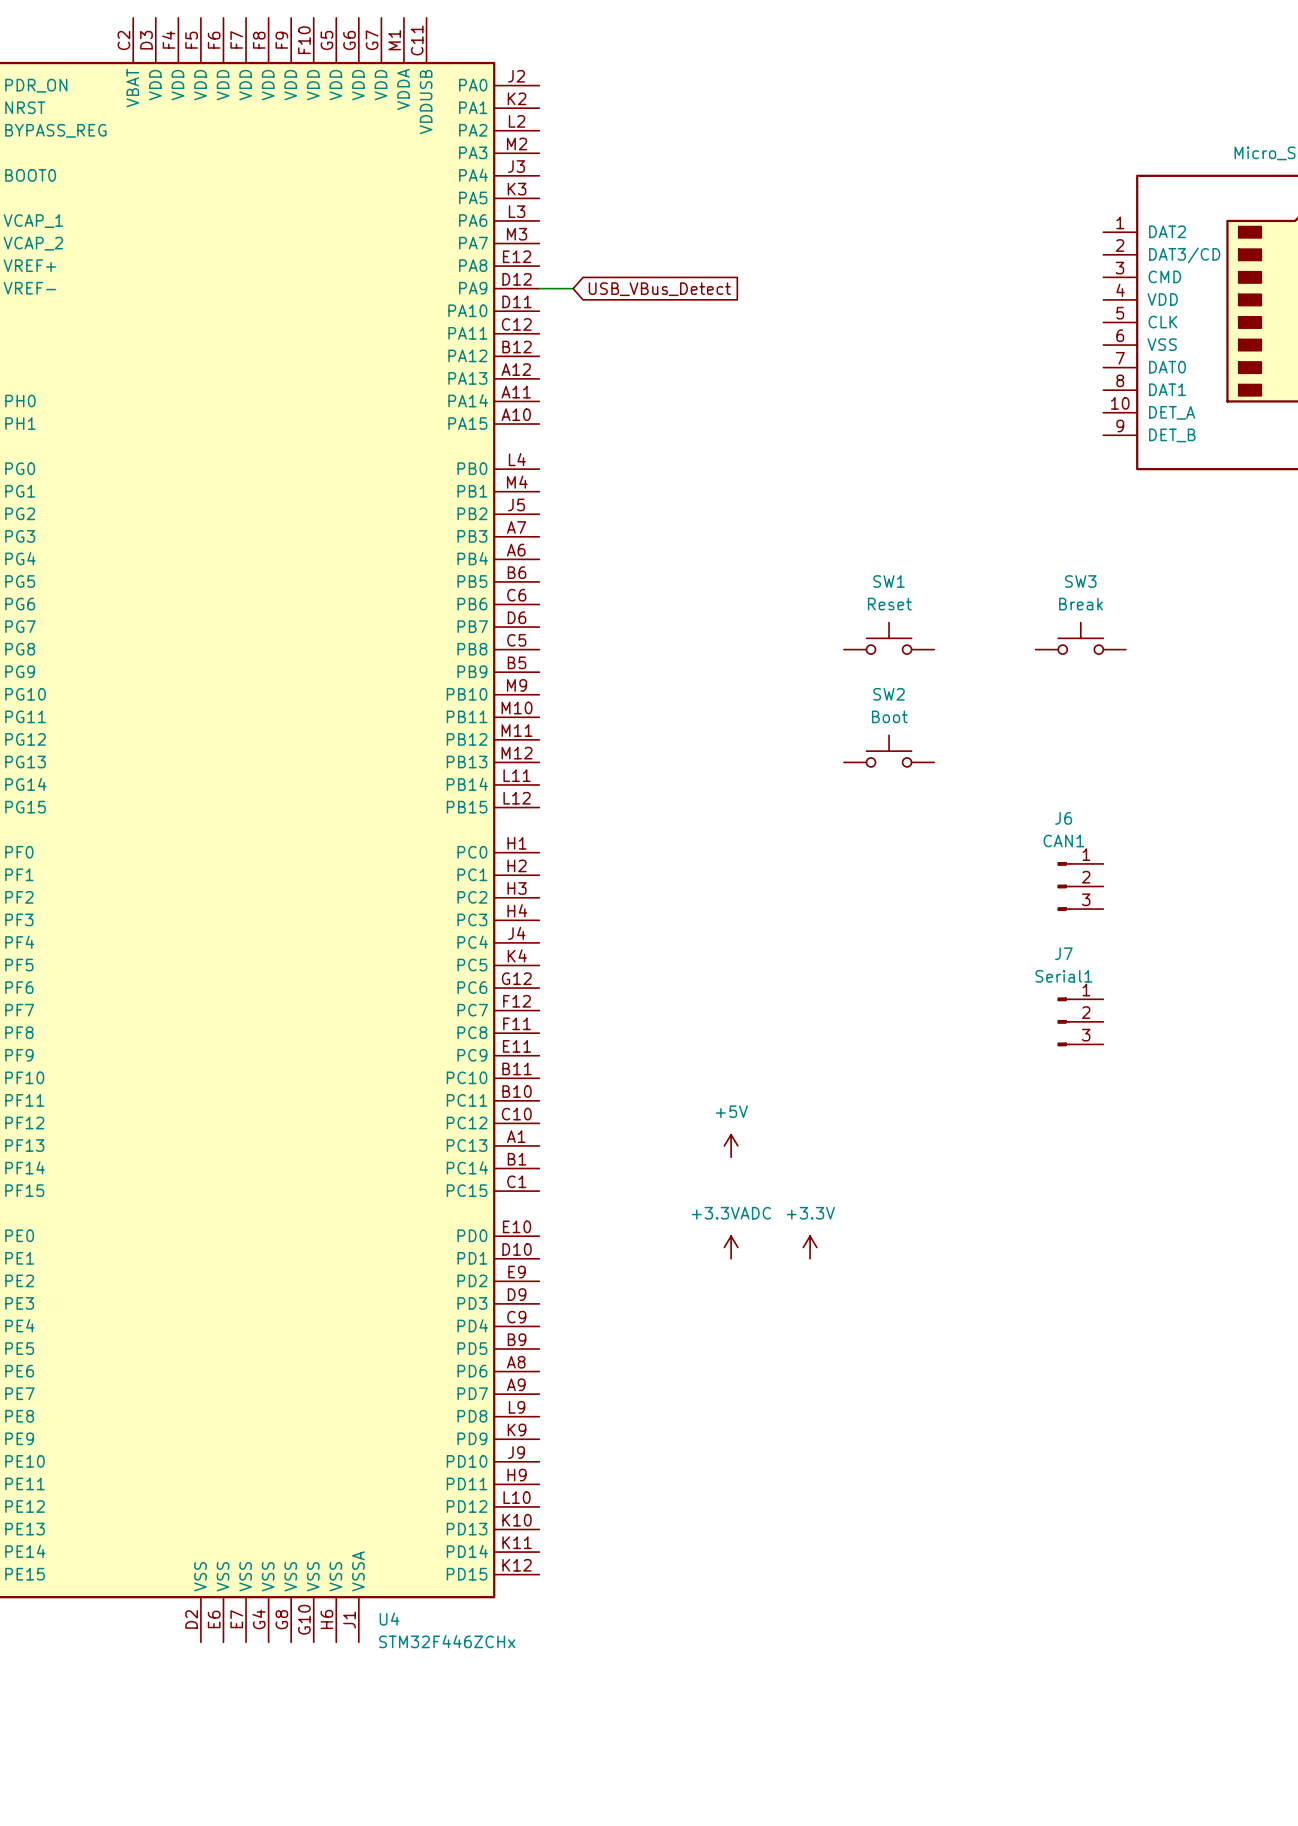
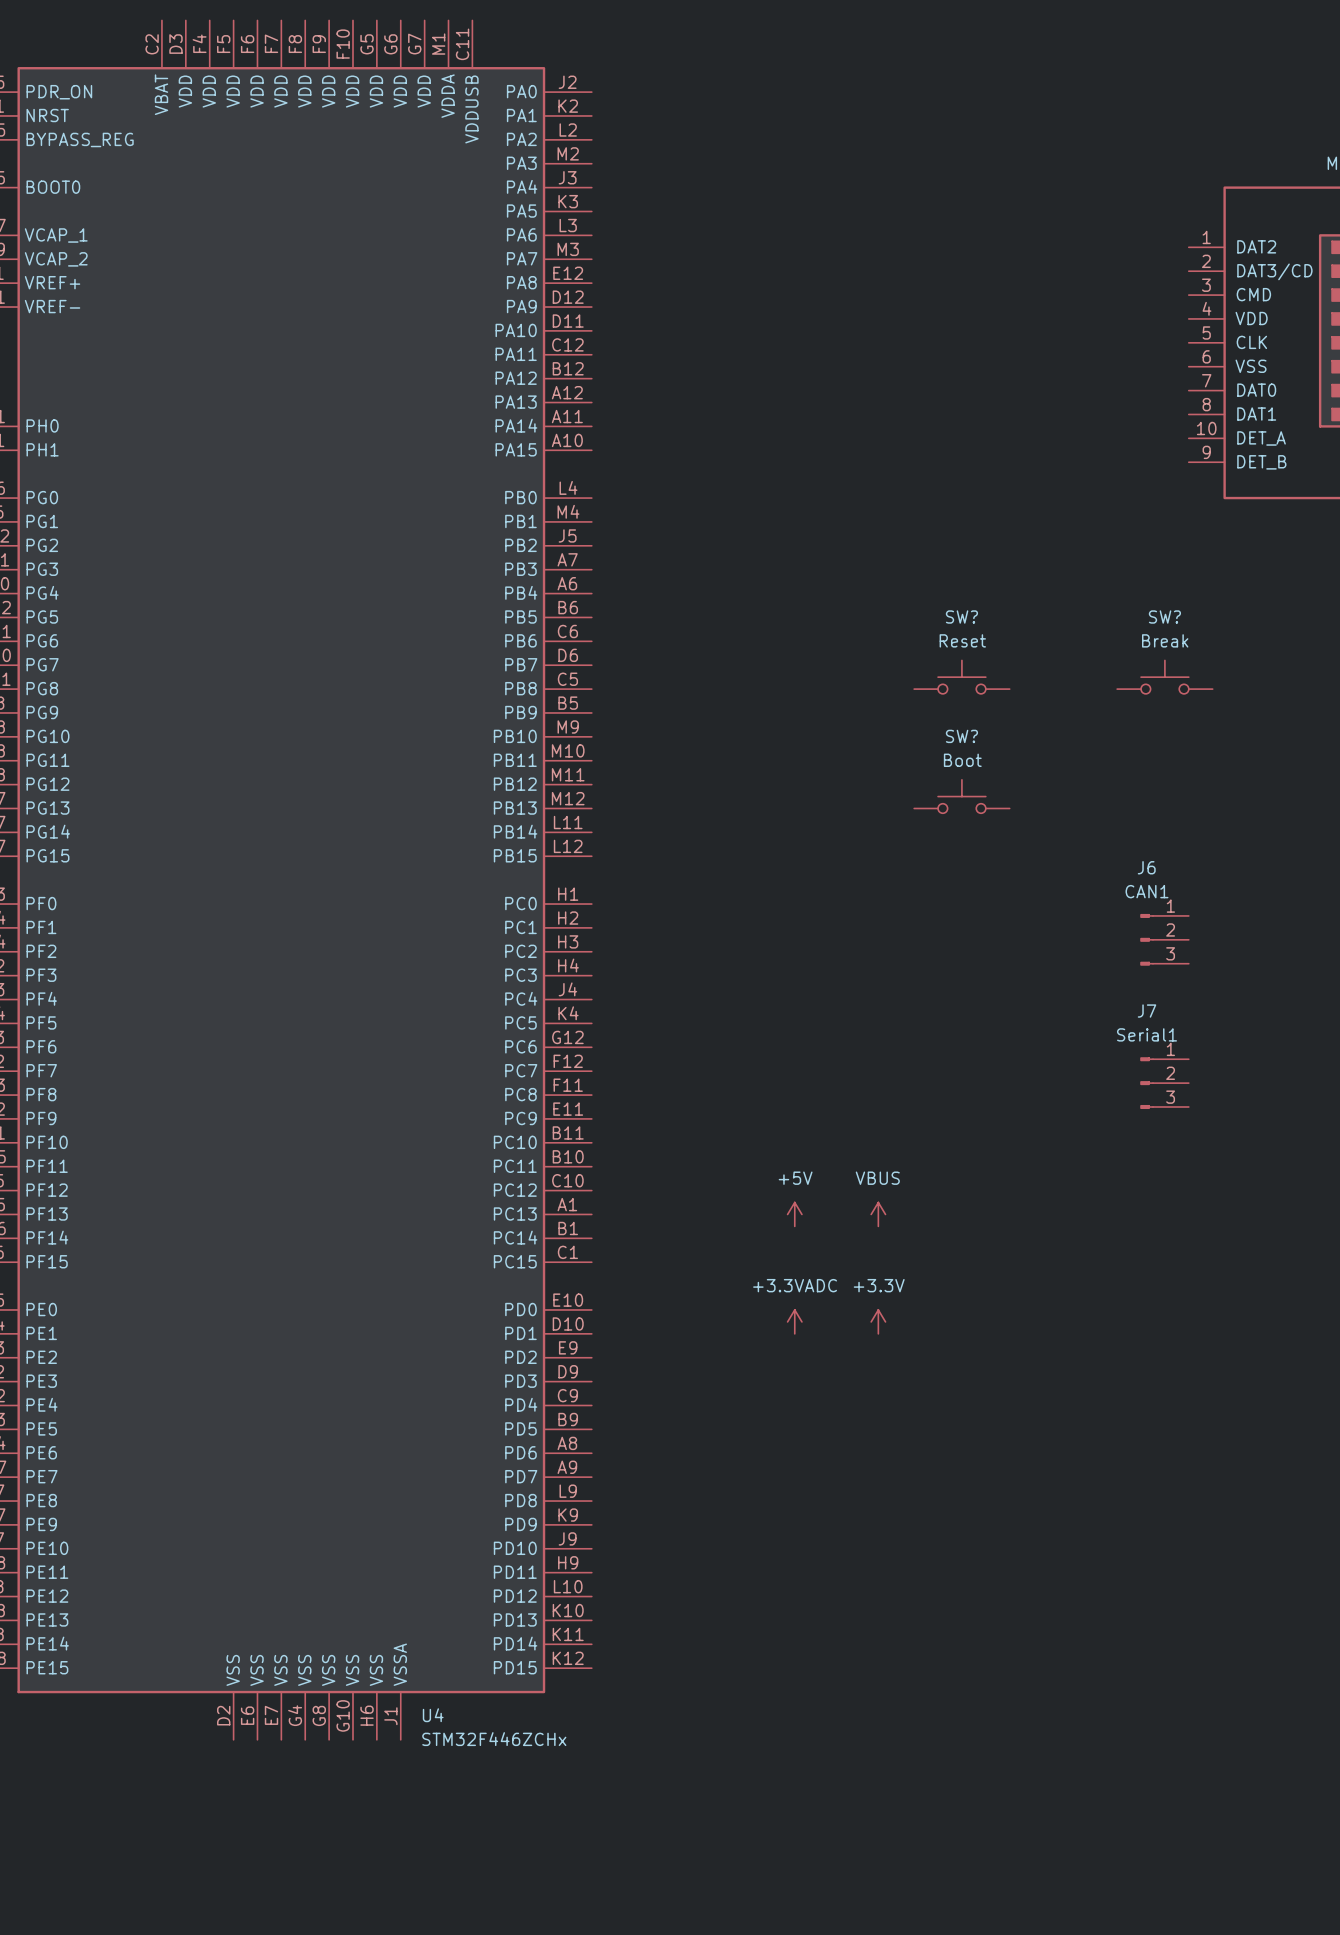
wire: (539, 288) (573, 288) -> none
global label: USB_VBus_Detect (659, 289) -> none
SW1 name: SW1 (889, 581) -> SW? (961, 617)
SW3 name: SW3 (1080, 581) -> SW? (1164, 617)
SW2 name: SW2 (889, 694) -> SW? (961, 736)
power symbol: none -> VBUS (878, 1214)

